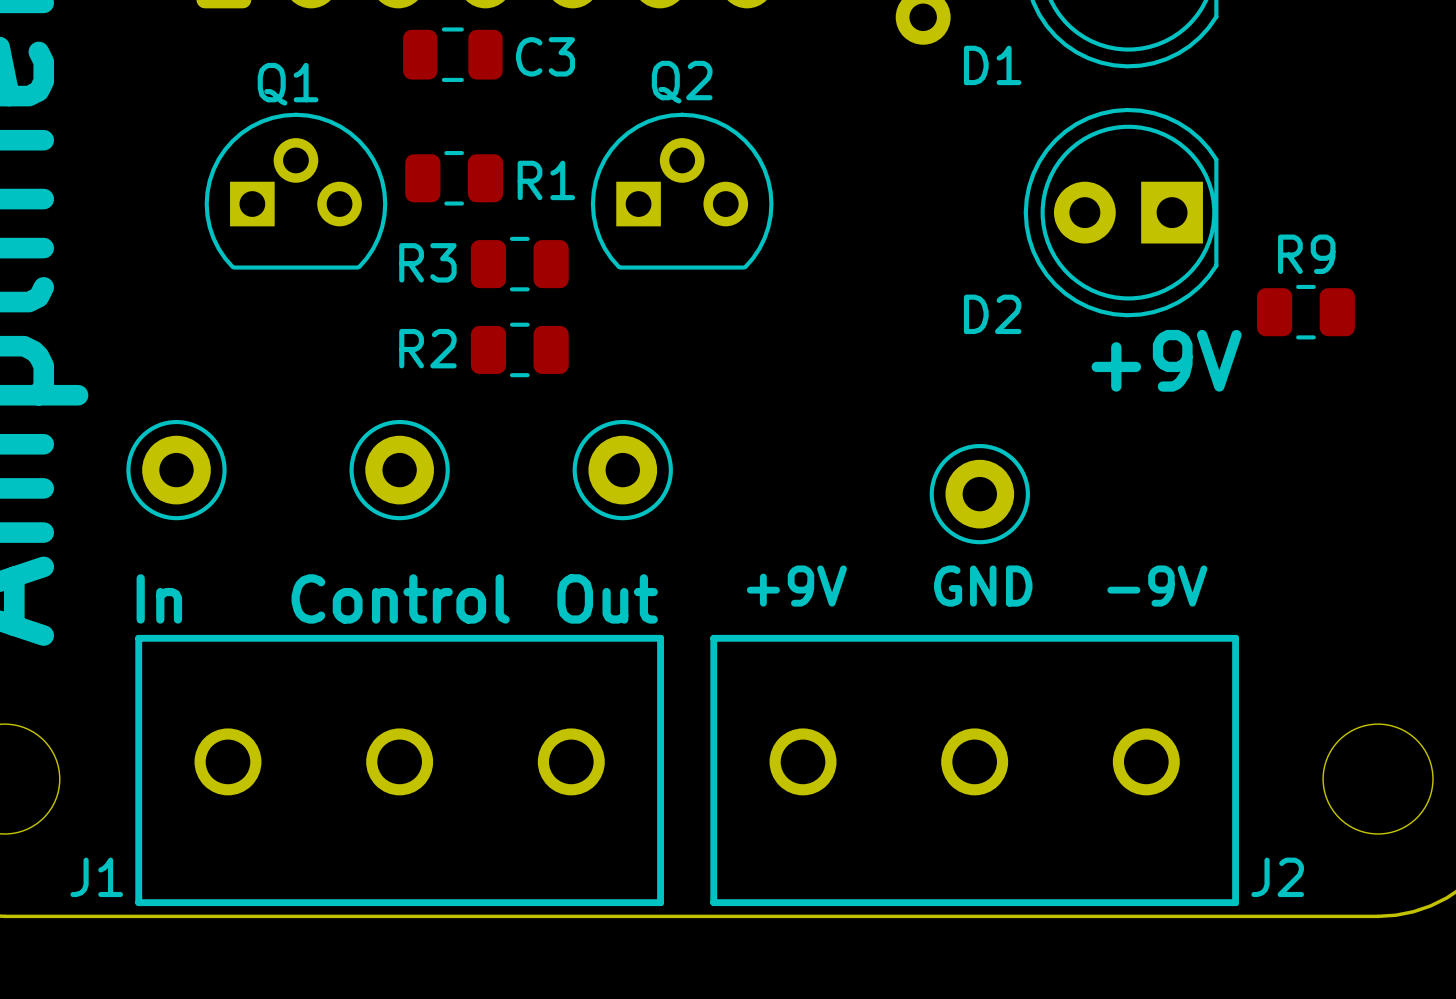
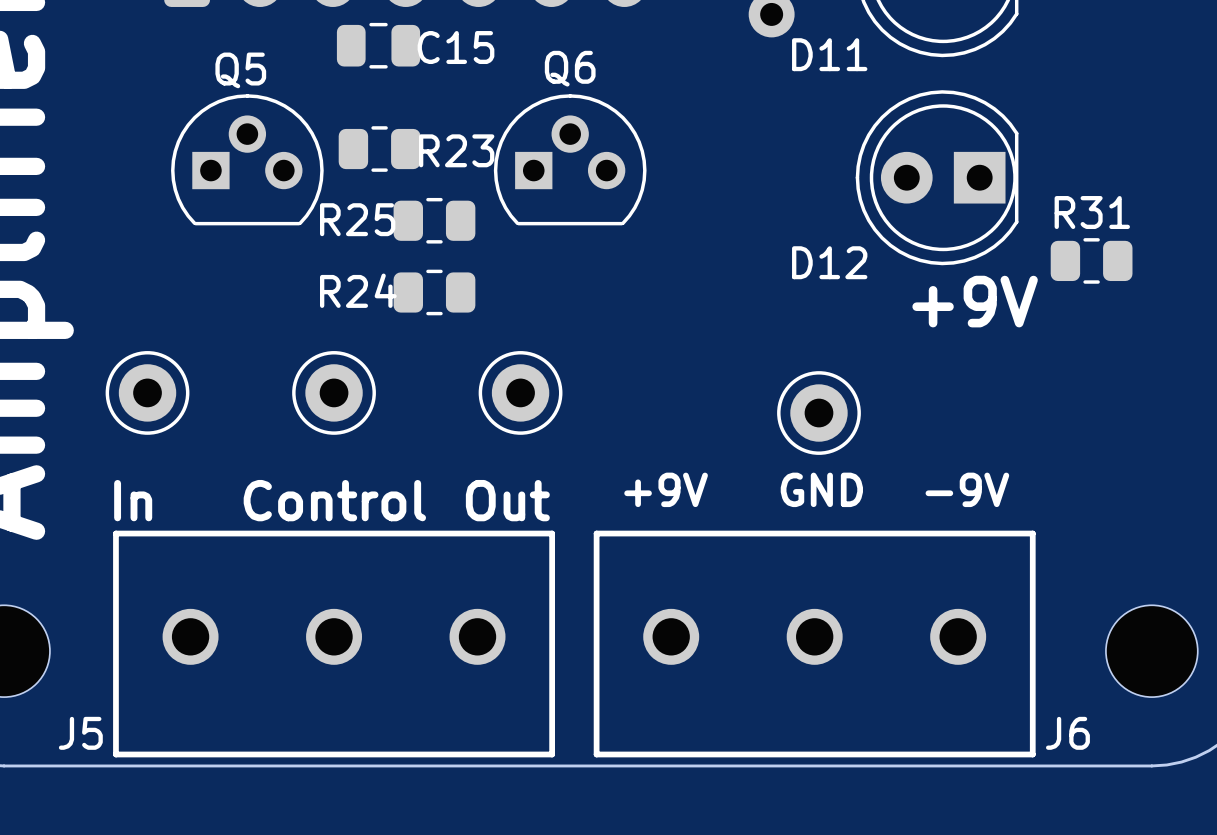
C3 name: C3 (545, 56) -> C15 (455, 47)
D1 name: D1 (992, 65) -> D11 (829, 54)
Q2 name: Q2 (682, 82) -> Q6 (570, 68)
Q1 name: Q1 (288, 84) -> Q5 (240, 70)
R1 name: R1 (546, 180) -> R23 (456, 150)
R9 name: R9 (1306, 254) -> R31 (1092, 212)
R3 name: R3 (427, 262) -> R25 (357, 219)
D2 name: D2 (992, 314) -> D12 (829, 262)
R2 name: R2 (427, 348) -> R24 (358, 290)
J1 name: J1 (96, 877) -> J5 (80, 733)
J2 name: J2 (1277, 877) -> J6 (1067, 733)

